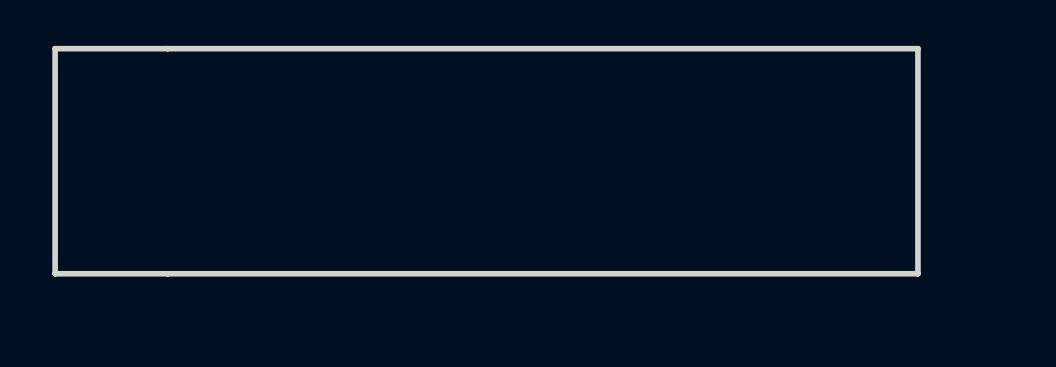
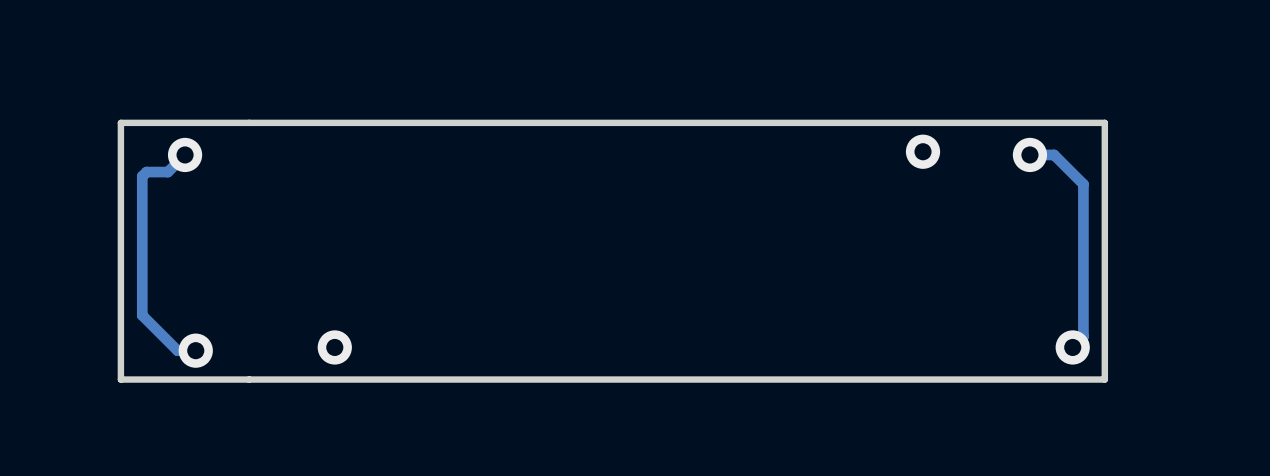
via: none -> (923, 151)
track: none -> (185, 154) (167, 172) (146, 172) (142, 176) (142, 315) (177, 350) (195, 350)
via: none -> (185, 154)
track: none -> (1029, 154) (1054, 154) (1083, 184) (1083, 336) (1072, 347)
via: none -> (1029, 154)
via: none -> (334, 347)
via: none -> (1072, 347)
via: none -> (195, 350)

